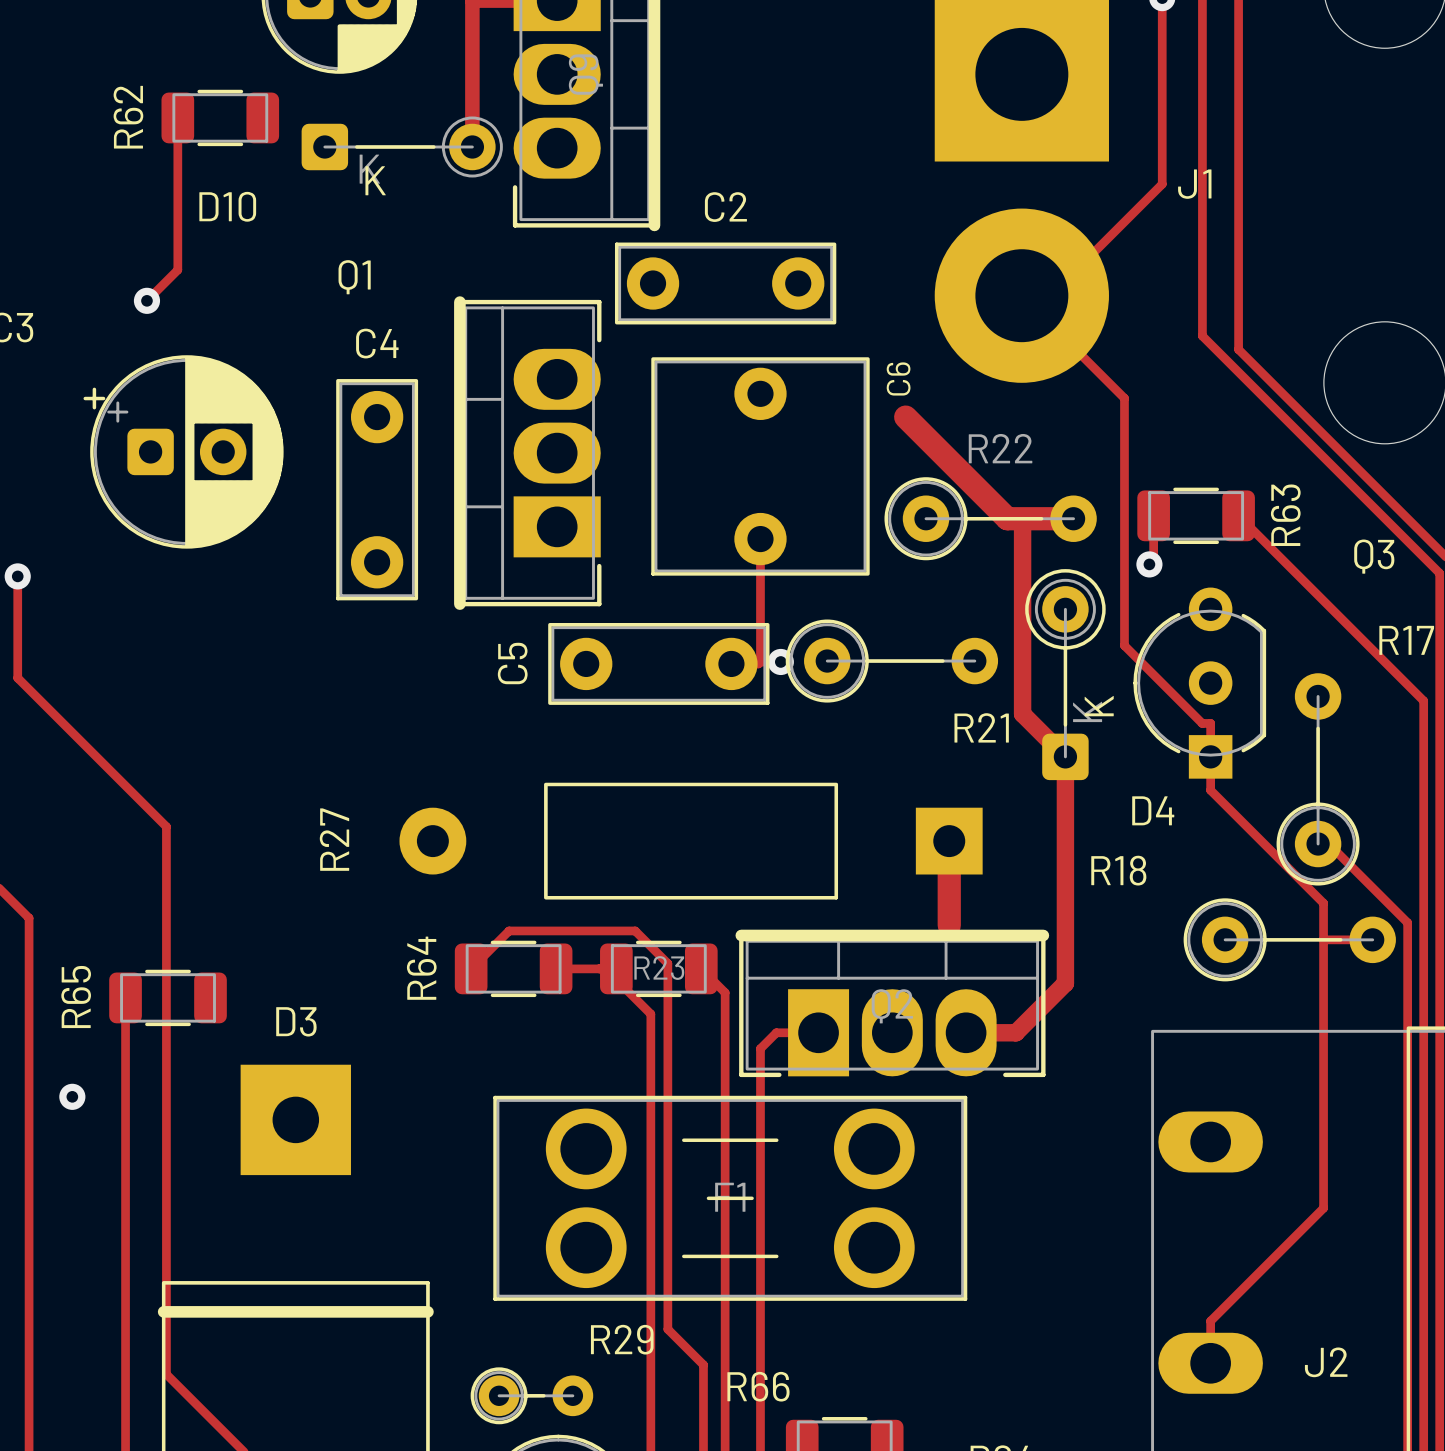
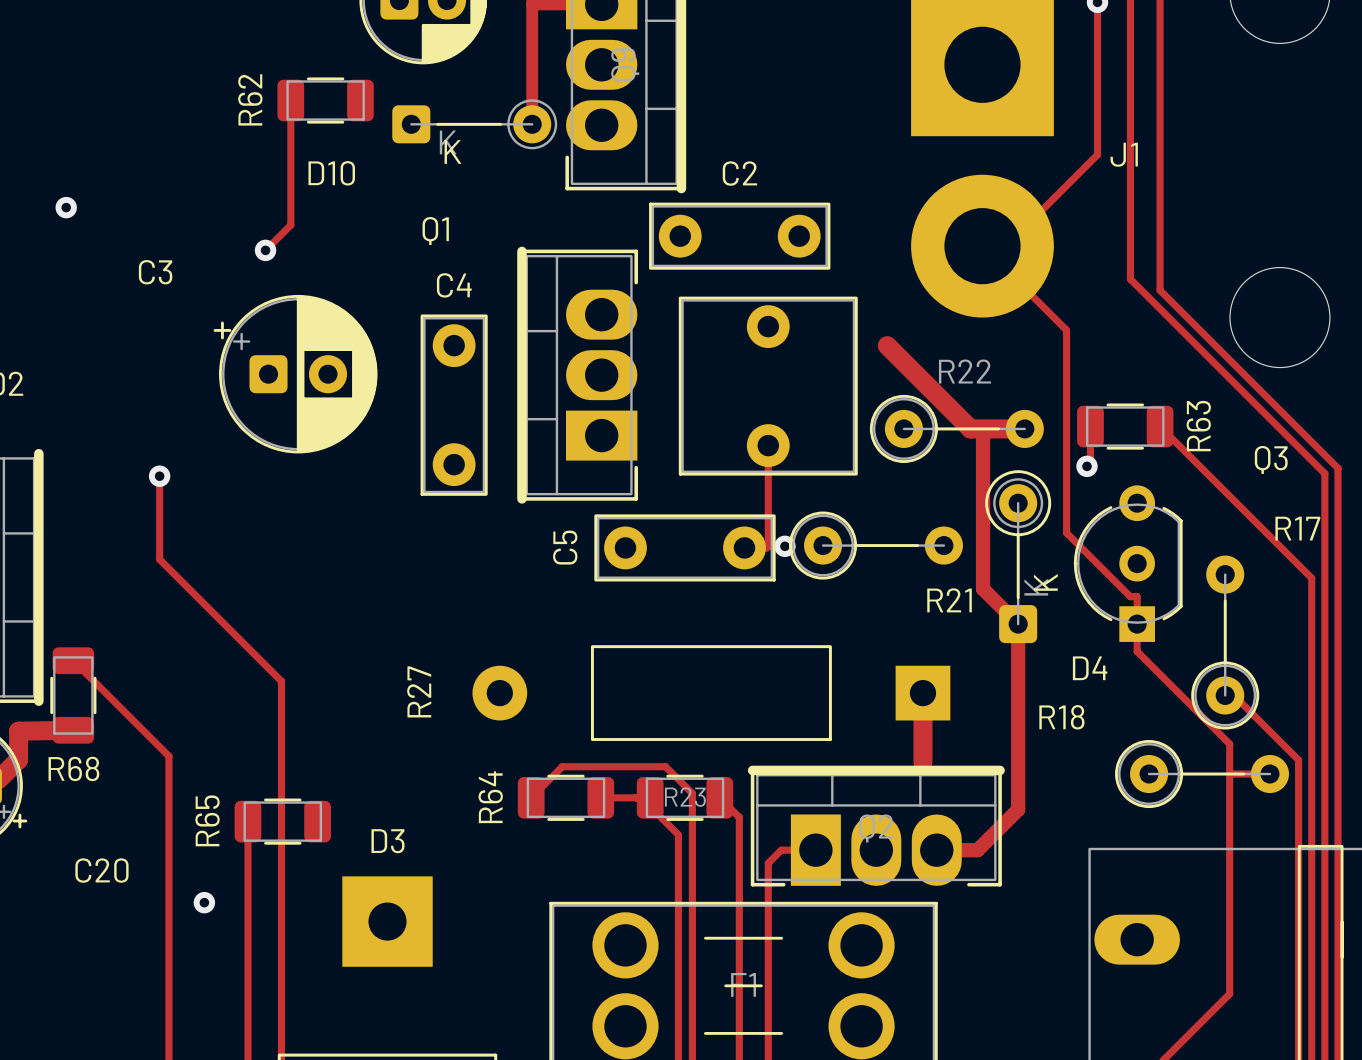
C6 name: C6 (898, 378) -> none

